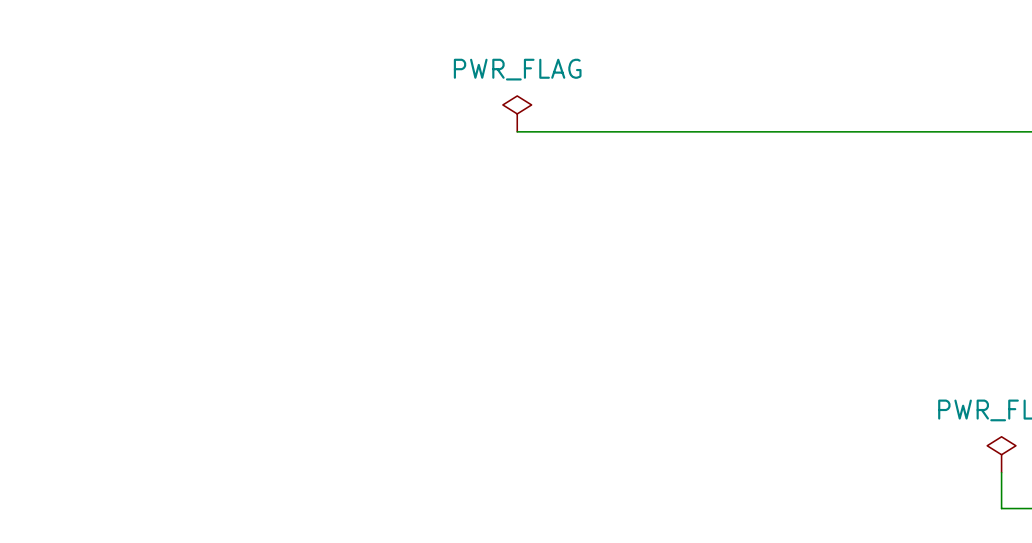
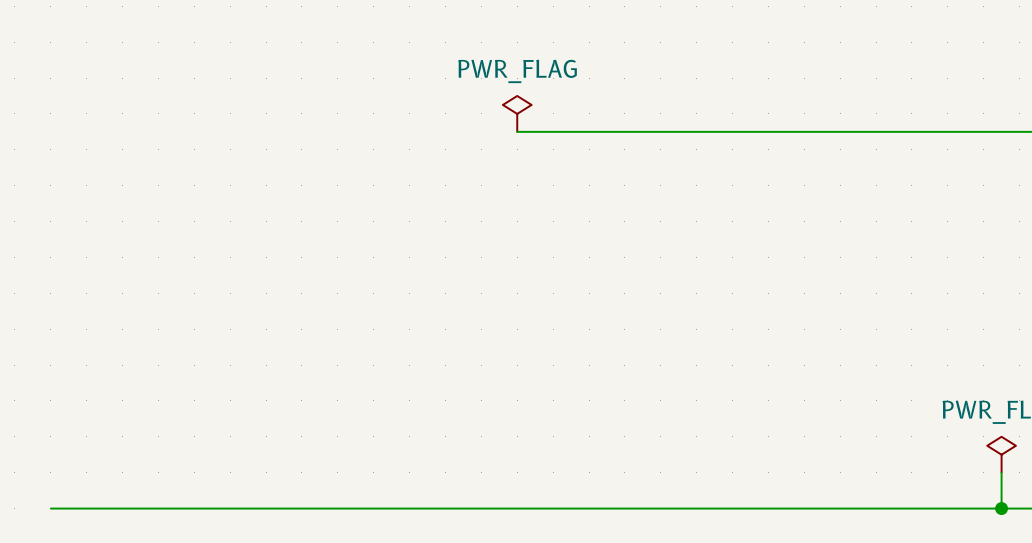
wire: none -> (50, 508) (1001, 508)
junction: none -> (1001, 508)

